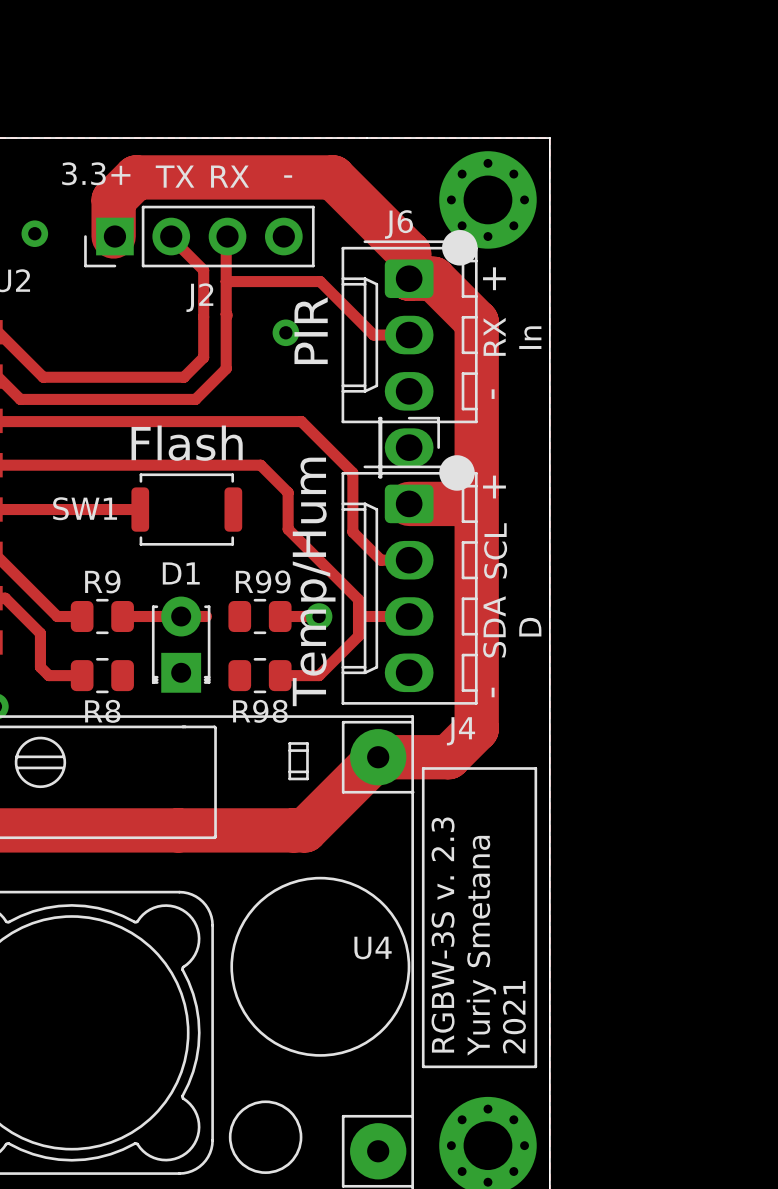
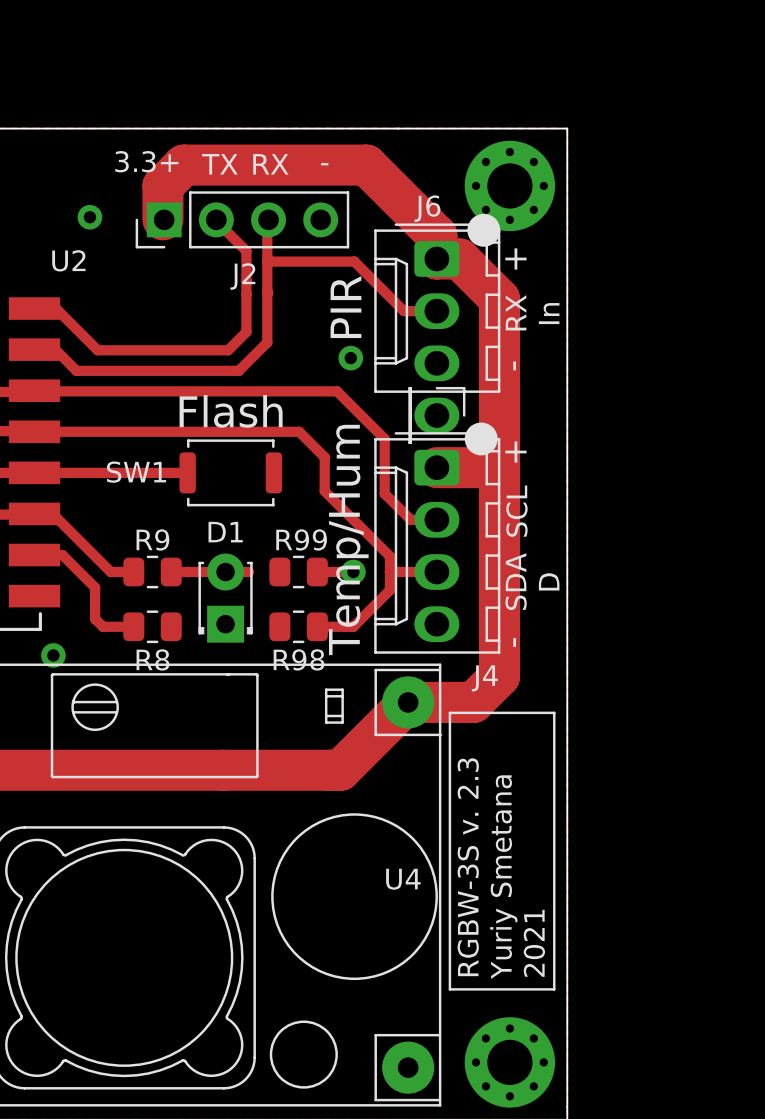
via position: (285, 332) -> (350, 358)

